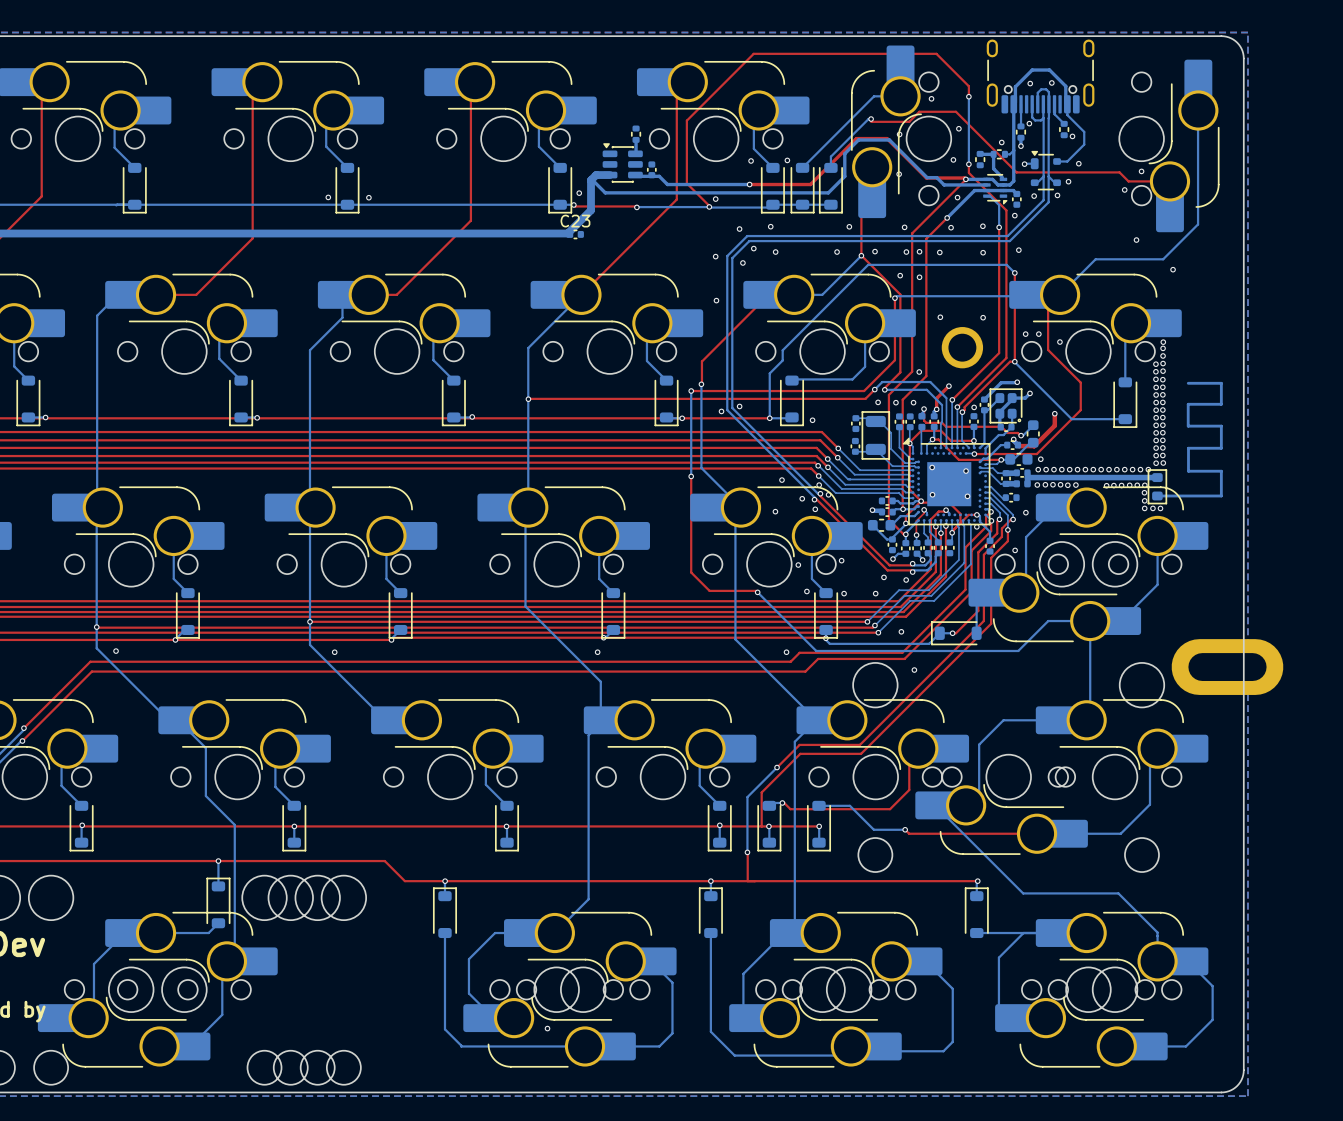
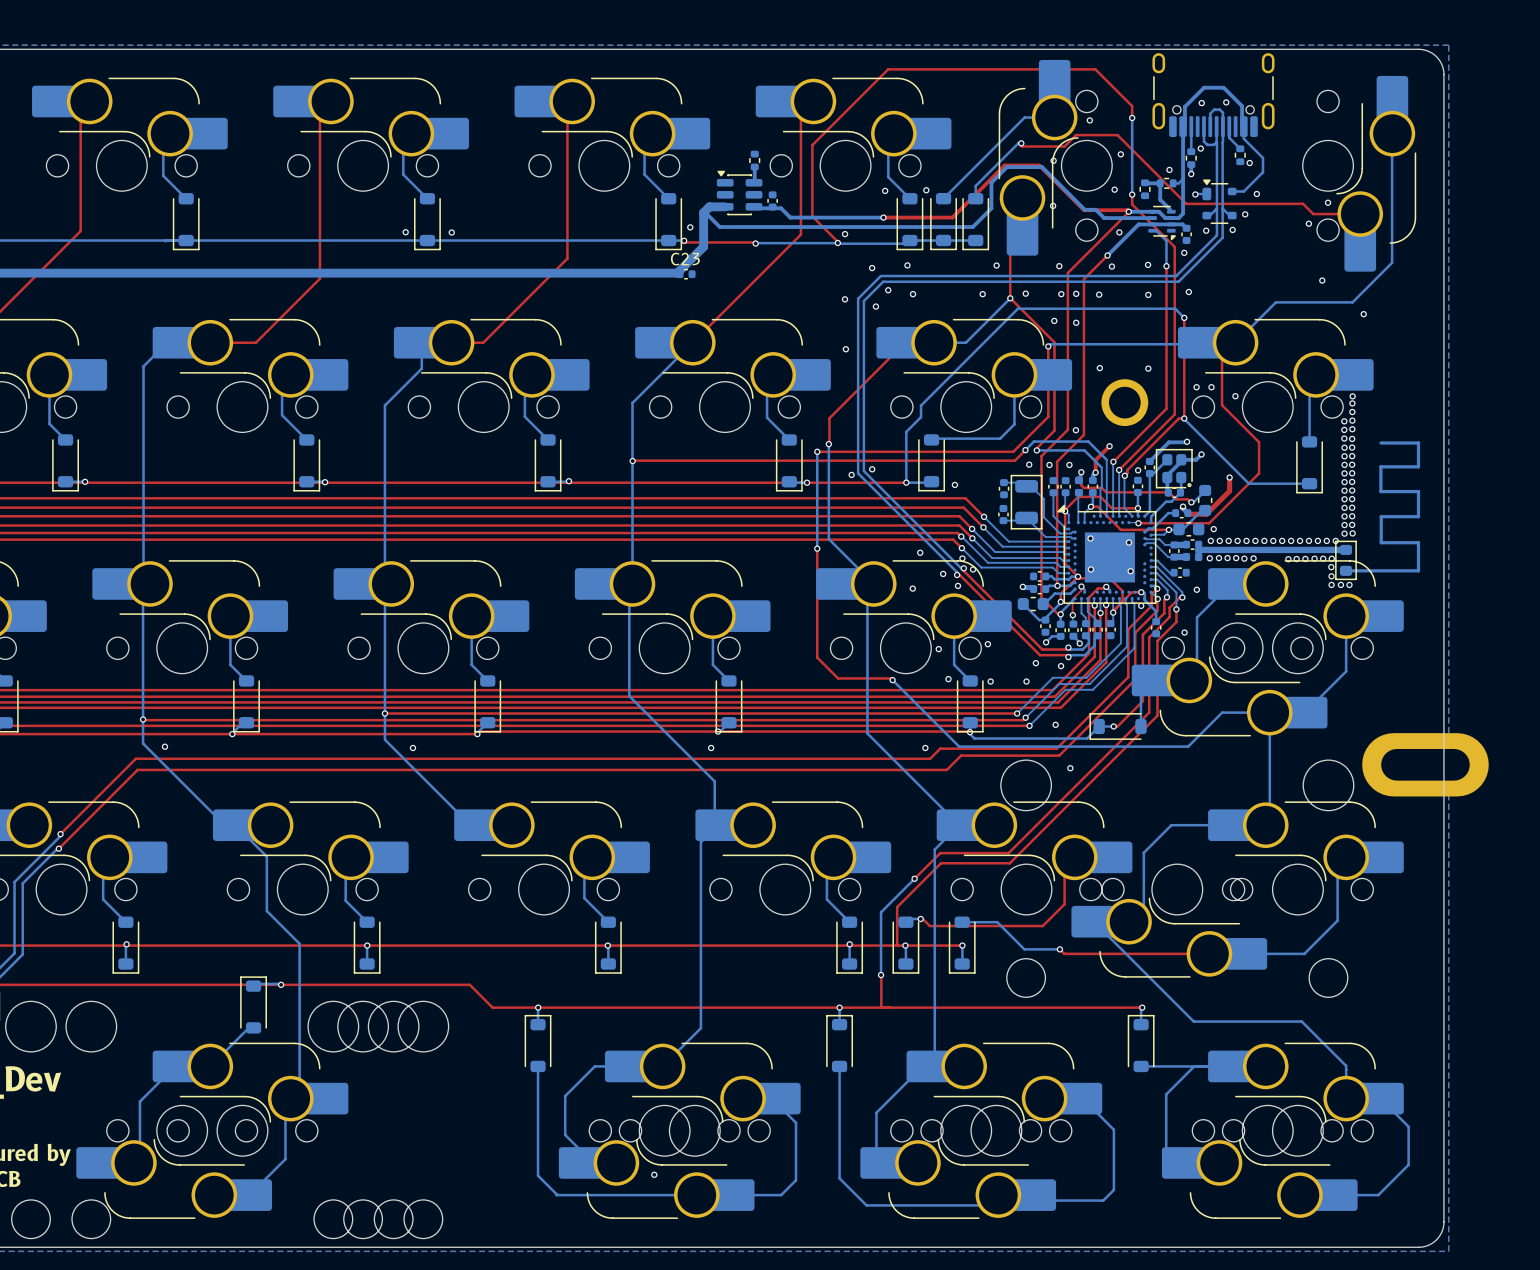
bottom track: none -> (277, 983) (255, 983) (253, 986)
bottom track: (218, 861) (218, 886) -> none
part position: (218, 903) -> (253, 1004)
bottom track: (218, 923) (208, 933) (156, 933) -> (253, 1027) (248, 1027) (210, 1066)

